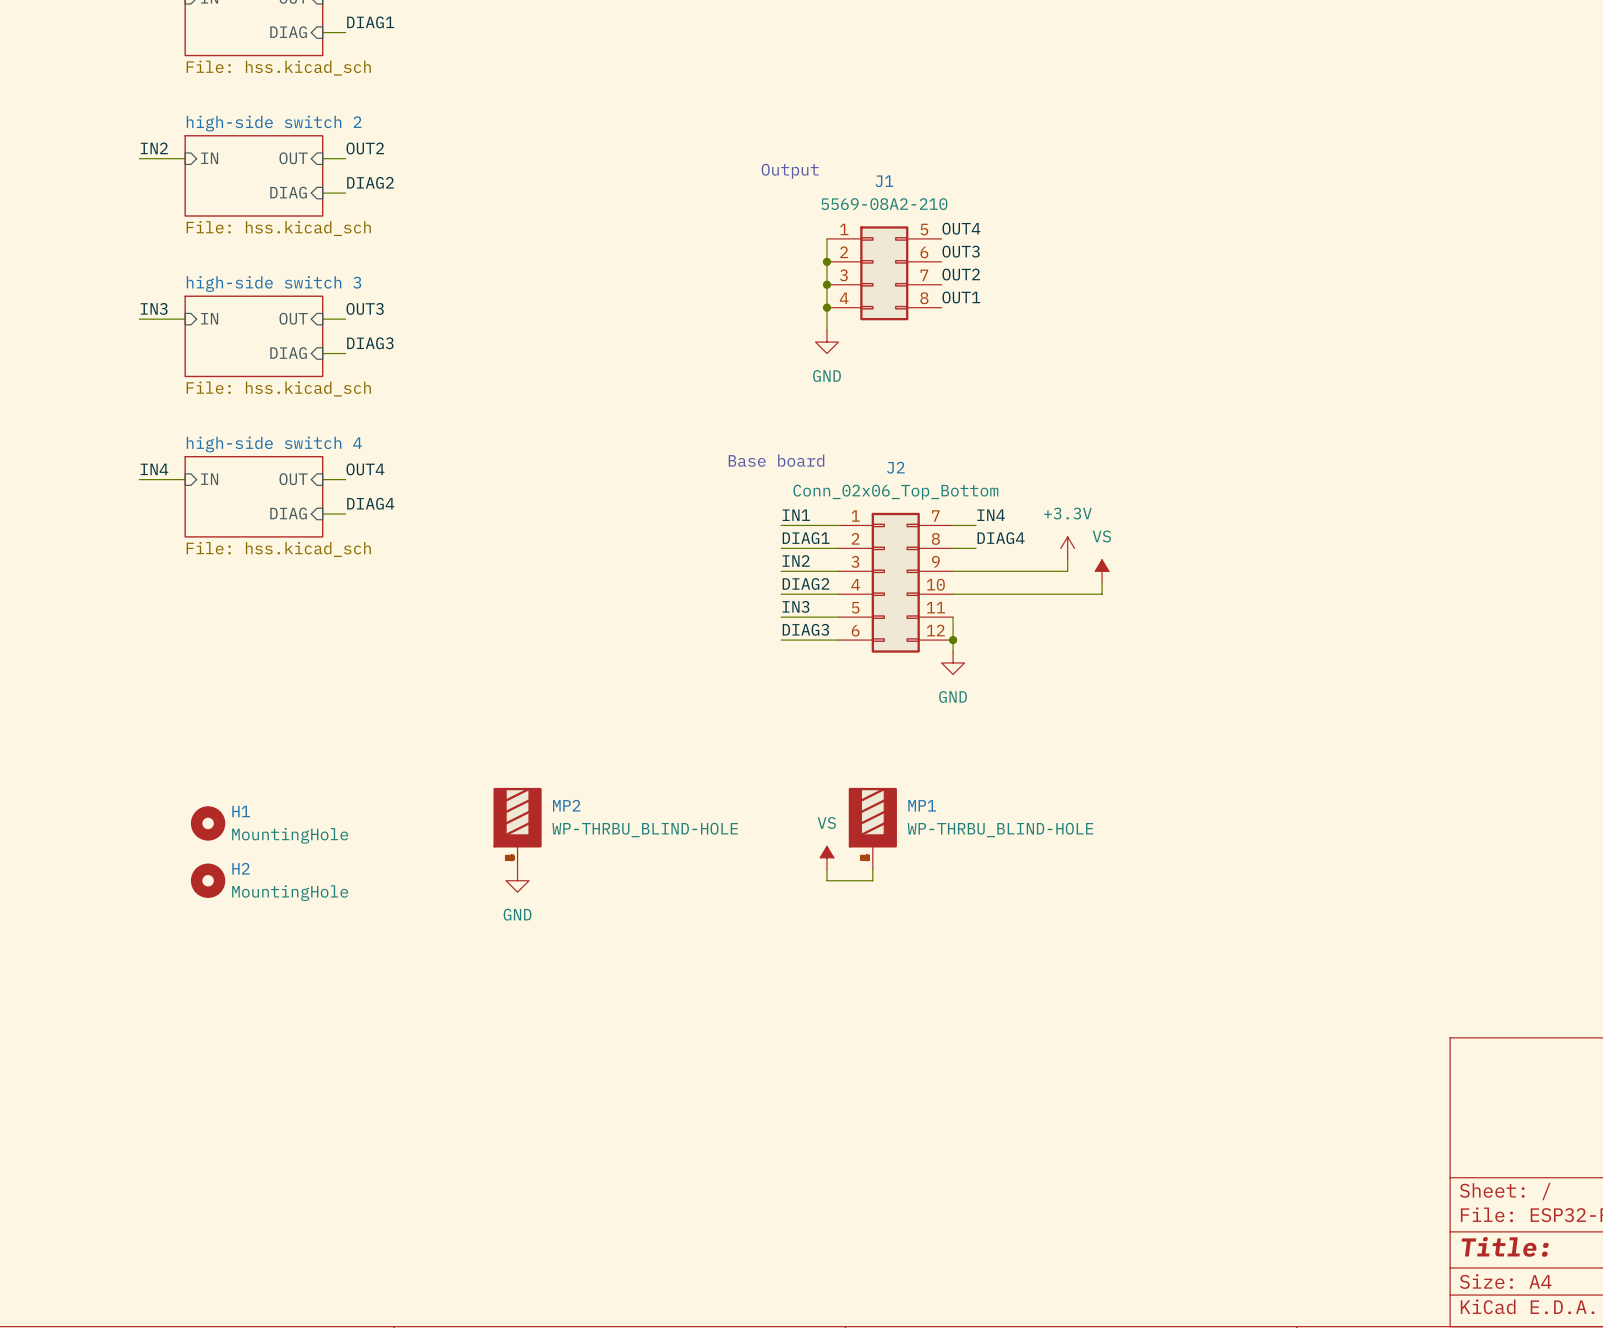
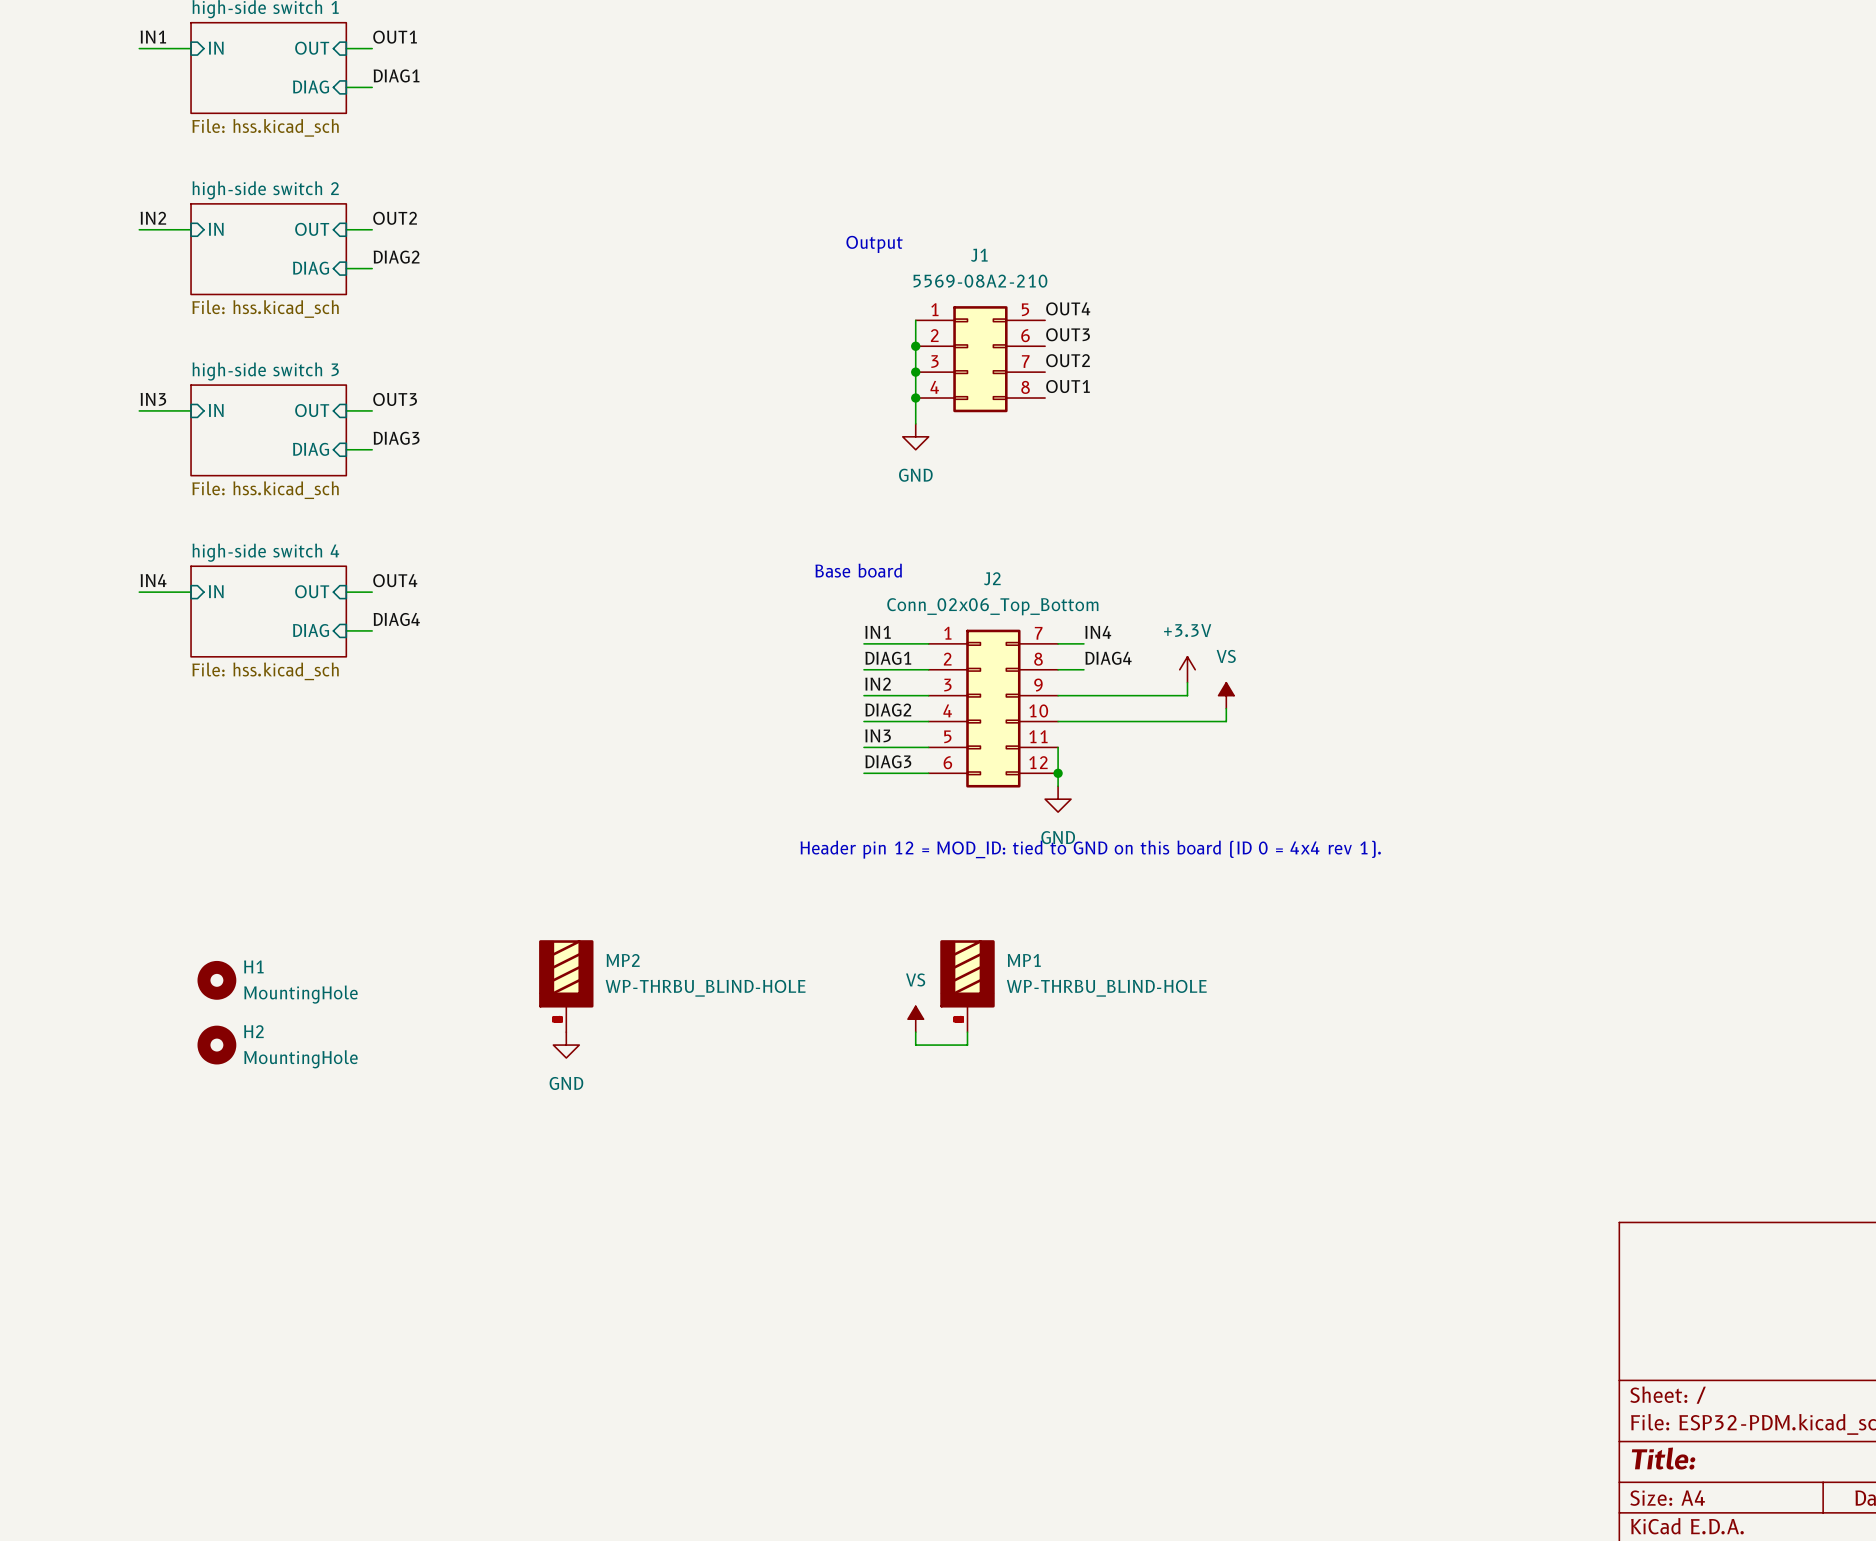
text: none -> Header pin 12 = MOD_ID: tied to GND on this board (ID 0 = 4x4 rev 1). (1090, 849)

